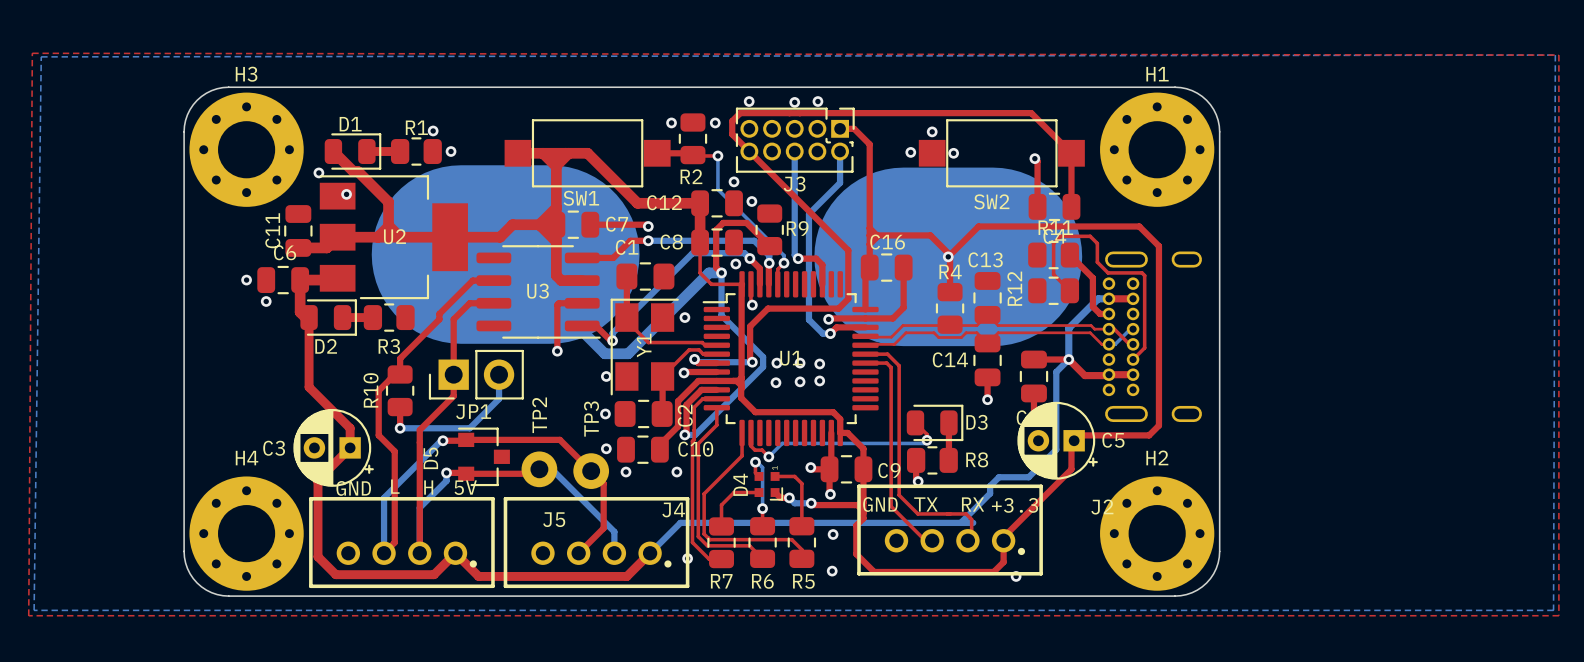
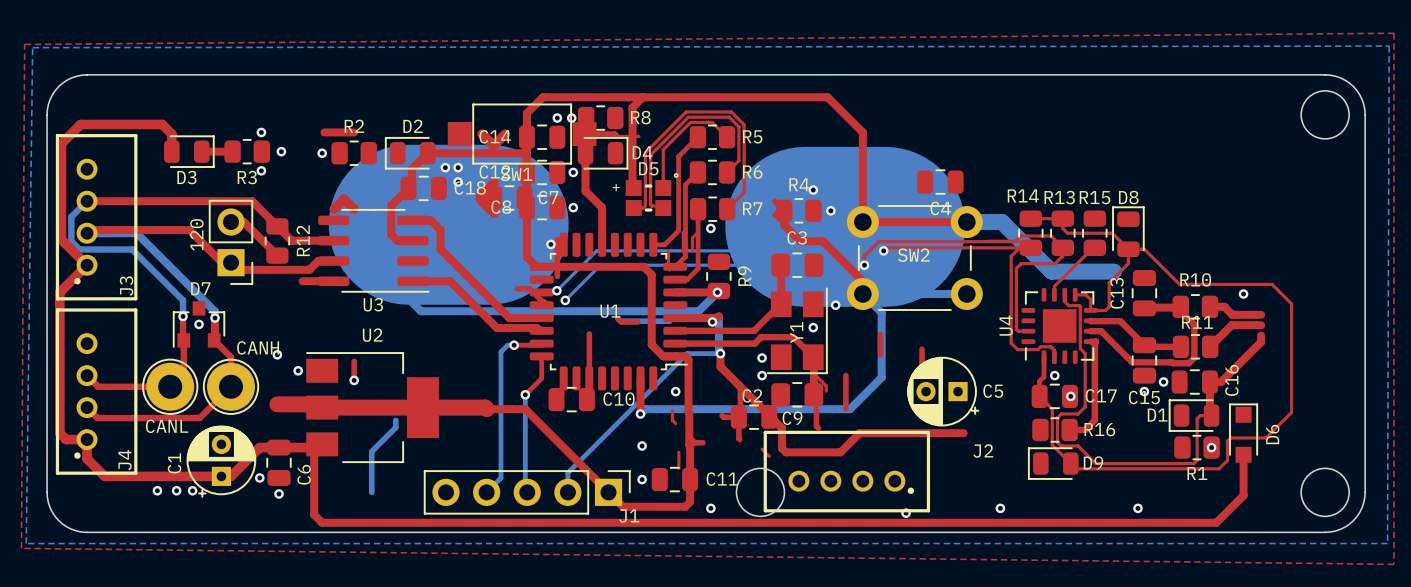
top zone outline: (32, 53) (1558, 55) (1558, 615) (28, 615) -> (24, 44) (1393, 33) (1393, 564) (21, 548)
board edge: (228, 87) (211, 90) (197, 100) (187, 114) (184, 131) (184, 557) (190, 573) (201, 586) (217, 594) (228, 596) (1175, 596) (1186, 594) (1197, 590) (1206, 583) (1213, 573) (1218, 563) (1219, 551) (1219, 131) (1216, 114) (1206, 100) (1192, 90) (1175, 87) -> (200, 74) (81, 75) (62, 83) (55, 90) (48, 104) (47, 492) (48, 502) (55, 516) (71, 529) (87, 532) (1325, 532) (1345, 527) (1359, 512) (1365, 492) (1365, 114) (1359, 94) (1345, 80) (1325, 74) (1048, 74)
via: (749, 101) -> none
via: (817, 101) -> none
via: (794, 102) -> none
round board edge: none -> [1300, 90, 1350, 140]
J3 footprint: [735, 107, 855, 173] -> [55, 134, 138, 301]
top track: none -> (642, 97) (632, 107) (633, 188)
SW2 footprint: [918, 119, 1085, 188] -> [846, 205, 983, 311]
via: (671, 122) -> none
via: (715, 122) -> none
D1 name position: D1 (350, 124) -> D1 (1157, 415)
R1 name position: R1 (416, 127) -> R1 (1197, 473)
top track: (840, 128) (854, 128) (869, 144) (869, 267) (865, 271) (865, 309) -> none
via: (433, 130) -> none
via: (932, 131) -> none
via: none -> (557, 118)
via: none -> (571, 118)
R2 rotation: 0° (692, 138) -> 90° clockwise (354, 153)
R2 position: (692, 138) -> (354, 153)
H3: (246, 149) -> none
H1: (1157, 149) -> none
via: none -> (261, 132)
top track: (333, 151) (353, 171) (358, 171) (388, 202) (388, 237) -> none
D1 rotation: 0° (352, 151) -> 180° (1194, 415)
D1 position: (352, 151) -> (1194, 415)
R1 position: (416, 151) -> (1196, 447)
via: (451, 151) -> none
bottom track: (794, 151) (794, 255) (798, 258) -> none
bottom track: (840, 151) (840, 182) (808, 214) (808, 319) (822, 333) (830, 333) -> none
via: (910, 152) -> none
top track: (517, 153) (587, 153) (637, 203) (700, 203) (700, 272) (711, 284) (742, 284) (741, 388) -> none
top track: (565, 153) (556, 162) (556, 275) (561, 280) (582, 280) -> none
via: (953, 153) -> none
bottom track: (717, 155) (717, 189) (784, 255) (784, 263) -> none
via: (717, 155) -> none
top track: none -> (697, 137) (678, 156) (678, 230) (664, 244) (653, 244)
top track: none -> (727, 137) (712, 122) (690, 122) (663, 149) (663, 188)
top track: (1034, 158) (1037, 161) (1037, 206) -> none
via: (1034, 158) -> none
top track: none -> (171, 151) (171, 134) (162, 124) (80, 124) (61, 143) (61, 239) (87, 265) (59, 292) (59, 433) (66, 439) (87, 439) (87, 458) (104, 476) (231, 476) (259, 447) (318, 447) (322, 444) (314, 452) (314, 514) (322, 522) (1216, 522) (1243, 495) (1243, 454)
top track: none -> (201, 151) (232, 151)
via: none -> (322, 153)
top track: none -> (526, 153) (427, 153) (411, 169) (411, 185) (391, 205) (391, 234) (397, 240) (412, 240)
top track: none -> (585, 153) (585, 191) (602, 207) (602, 244)
R2 name position: R2 (691, 176) -> R2 (354, 126)
via: (734, 181) -> none
J3 name position: J3 (794, 184) -> J3 (126, 286)
via: none -> (445, 167)
via: none -> (458, 167)
via: none -> (261, 170)
via: (346, 194) -> none
via: none -> (573, 172)
top track: none -> (697, 172) (685, 184) (685, 256) (675, 266)
top track: none -> (727, 172) (738, 160) (738, 126) (729, 117) (688, 117) (650, 154) (650, 204) (663, 208)
via: (751, 201) -> none
SW2 name position: SW2 (991, 201) -> SW2 (913, 255)
C12 position: (717, 203) -> (542, 172)
via: none -> (458, 182)
top track: (1071, 206) (1071, 153) (1031, 113) (740, 113) (732, 121) (732, 134) (848, 250) (848, 298) (838, 308) (767, 308) (750, 326) (750, 359) (752, 362) -> none
C18: none -> (423, 188)
via: none -> (813, 190)
top track: (556, 224) (512, 224) (500, 237) (337, 237) (326, 247) (298, 247) -> none
top track: (590, 224) (646, 224) (648, 226) -> none
via: (648, 226) -> none
top track: none -> (87, 201) (252, 201) (291, 240) (333, 240)
bottom track: none -> (87, 201) (71, 216) (71, 241) (79, 249) (132, 249) (183, 300) (183, 316)
R9 name rotation: 0° (797, 228) -> 90° counterclockwise (744, 276)
R9 position: (769, 229) -> (718, 276)
C11 name position: C11 (272, 230) -> C11 (722, 479)
C11 rotation: 0° (298, 230) -> 90° clockwise (674, 479)
C11 position: (298, 230) -> (674, 479)
via: none -> (573, 207)
top track: none -> (633, 208) (643, 208) (645, 206) (645, 152) (686, 111) (731, 111) (744, 124) (744, 192) (727, 209)
top track: (869, 235) (930, 235) (950, 255) (950, 285) -> none
U2 name position: U2 (394, 236) -> U2 (372, 335)
U2 position: (393, 237) -> (372, 407)
top track: none -> (698, 209) (698, 268) (687, 279) (675, 279)
top track: none -> (784, 210) (784, 225) (800, 241) (822, 241) (862, 281) (862, 294)
via: none -> (830, 210)
top track: (648, 240) (630, 240) (613, 257) (582, 257) -> none
bottom track: (648, 240) (754, 240) (769, 255) (769, 263) -> none
via: (648, 240) -> none
C8 position: (717, 242) -> (542, 207)
C16 name rotation: 0° (887, 242) -> 90° counterclockwise (1231, 380)
top track: (769, 246) (746, 222) (723, 222) (716, 230) (716, 267) (721, 272) -> none
C1 name position: C1 (627, 247) -> C1 (174, 463)
top track: none -> (1030, 218) (1062, 218) (1062, 228) (1067, 233) (1112, 233) (1128, 249)
top track: none -> (413, 220) (430, 220) (440, 230) (440, 249) (509, 318) (541, 318)
top track: none -> (231, 222) (243, 222) (277, 255)
top track: none -> (966, 222) (862, 222) (862, 132) (827, 97) (542, 97) (526, 113) (526, 257) (536, 266) (643, 266) (651, 274) (651, 344) (663, 356) (685, 356) (688, 359) (690, 501) (685, 506) (622, 506) (525, 409) (322, 407) (318, 404) (277, 404)
bottom track: none -> (966, 222) (1002, 222) (1051, 271) (1114, 271)
bottom track: (505, 254) (604, 353) (628, 353) (709, 272) (721, 272) (721, 315) (763, 357) (763, 366) (695, 434) (684, 434) -> none
R11 position: (1053, 255) -> (1195, 346)
top track: (1069, 255) (1092, 278) (1092, 306) (1100, 313) (1108, 313) -> none
via: (948, 256) -> none
top track: (749, 258) (759, 268) (759, 284) -> none
bottom track: (749, 258) (744, 253) (692, 253) (612, 333) (612, 340) -> none
via: (749, 258) -> none
top track: (798, 258) (816, 258) (822, 264) (822, 284) -> none
top track: (950, 258) (948, 256) (978, 226) (1139, 226) (1158, 246) (1158, 425) (1149, 435) (1073, 435) (1071, 437) (1071, 469) (1003, 537) (1003, 562) (993, 571) (874, 571) (856, 554) (856, 525) (863, 518) (863, 448) (847, 432) (840, 432) (840, 419) (833, 412) (755, 412) (741, 397) (741, 385) (736, 380) -> none
C13 name rotation: 0° (985, 259) -> 90° counterclockwise (1117, 293)
C1 footprint: [616, 262, 675, 291] -> [186, 425, 257, 498]
D8: none -> (1128, 231)
via: (769, 263) -> none
via: (784, 263) -> none
top track: none -> (87, 233) (90, 230) (189, 230) (222, 262) (231, 262) (238, 269) (309, 269) (318, 260) (333, 260)
bottom track: none -> (87, 233) (136, 233) (215, 311) (215, 318)
via: (735, 264) -> none
R14: none -> (1030, 233)
R13: none -> (1062, 233)
R15: none -> (1094, 233)
C16 position: (886, 267) -> (1194, 382)
top track: (903, 267) (903, 307) (892, 318) (828, 319) -> none
U1 footprint: [702, 271, 879, 447] -> [529, 232, 689, 391]
via: (721, 272) -> none
top track: (1108, 272) (1097, 262) (1097, 243) (1090, 236) (1060, 236) (1053, 243) (1053, 274) (1069, 290) -> none
top track: (1142, 272) (1144, 275) (1144, 347) (1133, 359) -> none
120: none -> (231, 242)
via: none -> (550, 244)
top track: (337, 278) (335, 280) (300, 280) (300, 312) (305, 317) (309, 317) (309, 387) (350, 428) (350, 447) (317, 480) (318, 556) (335, 574) (434, 574) (455, 553) (478, 576) (626, 576) (650, 553) -> none
via: (246, 280) -> none
C6 rotation: 0° (283, 280) -> 90° clockwise (278, 462)
C6 position: (283, 280) -> (278, 462)
top track: (493, 280) (472, 280) (439, 313) (439, 319) (400, 358) (400, 374) (394, 379) (389, 379) (378, 390) (378, 435) (394, 451) (394, 542) (384, 553) -> none
top track: none -> (1019, 247) (1011, 256) (1011, 343) (1017, 349) (1037, 349) (1040, 346) (1050, 346) (1054, 350) (1054, 357)
top track: none -> (1030, 247) (886, 247) (883, 250)
top track: none -> (1094, 247) (1054, 286) (1054, 294)
top track: none -> (1128, 249) (1128, 263) (1109, 282) (1109, 306) (1105, 310) (1090, 310) (1090, 299) (1086, 294) (1075, 294)
top track: none -> (1128, 249) (1144, 249) (1179, 284) (1272, 284) (1291, 303) (1291, 412) (1265, 437) (1230, 437) (1227, 441) (1227, 460) (1219, 468) (1076, 468) (1052, 445) (1052, 409) (1039, 396) (1039, 381) (1044, 376) (1044, 357)
bottom track: none -> (883, 250) (596, 250) (556, 290)
via: none -> (883, 250)
R12 name position: R12 (1014, 288) -> R12 (303, 240)
R12 rotation: 0° (1053, 290) -> 90° clockwise (277, 241)
R12 position: (1053, 290) -> (277, 241)
U3 position: (538, 291) -> (373, 250)
U3 name position: U3 (538, 291) -> U3 (373, 304)
C13 position: (987, 297) -> (1144, 293)
top track: (1108, 298) (1133, 298) -> none
bottom track: (1108, 298) (1098, 298) (1068, 328) (1068, 359) (1056, 372) (1056, 449) (1028, 477) (999, 477) (990, 486) (990, 493) (960, 522) -> none
top track: none -> (780, 265) (781, 304) (754, 330) (675, 330)
top track: none -> (864, 265) (864, 255) (878, 241) (1014, 241) (1020, 236) (1050, 236) (1062, 247) (1062, 256) (1055, 263) (1021, 263) (1016, 268) (1016, 329) (1018, 331) (1028, 331)
bottom track: none -> (864, 265) (600, 265) (565, 300)
via: none -> (864, 265)
via: (266, 301) -> none
top track: (493, 303) (469, 303) (453, 319) (453, 396) (419, 430) (419, 553) -> none
top track: (582, 303) (559, 303) (557, 304) (557, 351) -> none
via: (752, 305) -> none
bottom track: none -> (382, 273) (420, 311) (698, 311) (717, 292)
R4 rotation: 0° (950, 308) -> 90° clockwise (798, 210)
R4 position: (950, 308) -> (798, 210)
D2 rotation: 0° (328, 317) -> 180° (410, 153)
D2 position: (328, 317) -> (410, 153)
R3 position: (389, 317) -> (247, 151)
top track: none -> (412, 281) (450, 281) (496, 328) (536, 328) (541, 330)
via: (684, 317) -> none
via: (828, 319) -> none
top track: (626, 321) (648, 342) (702, 342) (704, 345) (716, 345) -> none
top track: (865, 327) (836, 327) (830, 333) -> none
via: none -> (556, 290)
top track: none -> (718, 291) (675, 292)
bottom track: (1133, 329) (1130, 329) (1115, 344) (1108, 344) -> none
via: none -> (717, 292)
bottom track: none -> (966, 294) (862, 294) (881, 312) (881, 377) (850, 409) (645, 409) (640, 413)
via: none -> (1243, 294)
top track: none -> (1064, 294) (1064, 301) (1068, 305) (1080, 306) (1080, 348) (1085, 353) (1085, 406) (1078, 413) (1061, 413) (1057, 417) (1057, 442) (1061, 445) (1078, 445) (1095, 463) (1193, 463) (1197, 460) (1197, 418) (1200, 415) (1211, 415) (1209, 413) (1209, 382) (1221, 382) (1261, 342) (1261, 335)
via: (830, 333) -> none
top track: (865, 336) (891, 337) (903, 325) (976, 325) (987, 314) (998, 325) (1091, 325) (1094, 329) (1114, 329) (1129, 344) (1133, 344) -> none
part: (1152, 336) -> none
via: none -> (565, 300)
via: (612, 340) -> none
via: none -> (835, 305)
top track: (1108, 344) (1101, 344) (1090, 332) (998, 332) (987, 343) (976, 332) (966, 332) (961, 337) (938, 337) (933, 332) (906, 332) (894, 344) (865, 345) -> none
top track: none -> (1180, 306) (1145, 306) (1144, 308) (1177, 308) (1194, 324) (1194, 357) (1189, 363) (1132, 362) (1101, 331) (1090, 331)
top track: none -> (1209, 306) (1224, 306) (1232, 314) (1261, 314)
Y1 rotation: 0° (644, 347) -> 180° (797, 330)
Y1 position: (644, 347) -> (797, 330)
via: (557, 351) -> none
top track: (716, 354) (703, 354) (699, 349) (689, 349) (662, 376) -> none
top track: (865, 354) (887, 354) (899, 365) (899, 495) (917, 513) (966, 513) (971, 519) (971, 541) -> none
top track: none -> (183, 316) (183, 373) (170, 386) (98, 386) (87, 375)
via: none -> (183, 316)
top track: none -> (718, 316) (717, 318) (675, 318)
bottom track: none -> (718, 316) (718, 352) (720, 353) (687, 353) (567, 472) (567, 492)
top track: none -> (215, 318) (214, 340) (231, 357) (231, 386) (199, 418) (97, 418) (87, 407)
via: none -> (215, 318)
via: (694, 359) -> none
top track: (1033, 359) (1068, 359) (1084, 375) (1133, 374) -> none
via: (1068, 359) -> none
C14 rotation: 0° (987, 360) -> 90° clockwise (542, 137)
C14 position: (987, 360) -> (542, 137)
top track: none -> (1090, 320) (1120, 321) (1145, 346) (1180, 346)
via: (752, 362) -> none
via: (776, 363) -> none
via: (819, 363) -> none
top track: (865, 363) (886, 363) (891, 367) (891, 506) (926, 541) -> none
D7: none -> (199, 324)
via: none -> (199, 324)
top track: none -> (1261, 325) (1231, 325) (1210, 346)
U4: none -> (1059, 326)
via: none -> (813, 327)
via: (684, 372) -> none
top track: (716, 372) (684, 372) -> none
JP1: (476, 374) -> none
bottom track: (499, 374) (499, 398) (469, 428) (400, 428) -> none
via: (606, 376) -> none
C15 position: (1033, 376) -> (1144, 360)
top track: (741, 377) (738, 380) (698, 380) (678, 401) (678, 426) (659, 444) (659, 449) -> none
via: (819, 380) -> none
via: (800, 381) -> none
via: (775, 382) -> none
top track: none -> (1090, 341) (1096, 341) (1094, 420) (1085, 429) (1069, 429)
top track: none -> (541, 343) (540, 345) (514, 345)
top track: none -> (675, 343) (754, 343) (761, 337) (793, 337) (813, 357) (813, 394)
bottom track: none -> (514, 345) (507, 345) (500, 351) (500, 478) (486, 492)
via: none -> (514, 345)
top track: (716, 389) (701, 389) (686, 404) (686, 433) (684, 434) -> none
R10 rotation: 0° (400, 390) -> 90° clockwise (1195, 306)
R10 position: (400, 390) -> (1195, 306)
top track: (716, 398) (702, 398) (694, 407) (692, 542) (709, 559) (721, 559) -> none
top track: none -> (720, 353) (720, 366) (782, 428) (782, 448) (786, 452) (840, 452) (859, 433) (963, 433)
via: none -> (720, 353)
via: none -> (277, 354)
via: (987, 399) -> none
top track: none -> (541, 356) (541, 378) (525, 394)
via: none -> (762, 358)
top track: (716, 407) (716, 425) (698, 443) (698, 536) (707, 545) (749, 545) (762, 558) -> none
C3 footprint: [293, 408, 374, 487] -> [771, 252, 824, 278]
via: (605, 413) -> none
C2 position: (643, 413) -> (797, 394)
C2 name rotation: 0° (685, 415) -> 90° clockwise (752, 395)
C2 name position: C2 (685, 415) -> C2 (752, 395)
via: none -> (298, 370)
via: none -> (762, 375)
D3 position: (935, 422) -> (189, 151)
D3 name position: D3 (976, 422) -> D3 (186, 177)
via: none -> (1054, 375)
top track: none -> (640, 378) (640, 413)
D5 footprint: [457, 427, 510, 487] -> [625, 173, 679, 217]
via: none -> (1163, 382)
top track: (742, 432) (742, 455) (704, 493) (704, 534) (708, 537) -> none
top track: (750, 432) (750, 446) (755, 450) (762, 450) (768, 456) -> none
via: (684, 434) -> none
CANL: none -> (170, 386)
CANH: none -> (231, 386)
top track: (442, 440) (559, 439) (603, 483) (603, 528) (578, 553) -> none
bottom track: (442, 440) (384, 497) (384, 553) -> none
via: (442, 440) -> none
via: none -> (675, 391)
bottom track: (927, 440) (923, 443) (782, 443) (768, 456) -> none
via: (927, 440) -> none
via: none -> (1144, 391)
bottom track: none -> (525, 394) (525, 490) (527, 492)
C17: none -> (1054, 396)
via: none -> (1070, 396)
C3 name position: C3 (274, 448) -> C3 (797, 237)
via position: (606, 448) -> (525, 394)
via: (768, 456) -> none
D5 name position: D5 (430, 458) -> D5 (648, 168)
R8 position: (932, 460) -> (600, 118)
bottom track: (755, 462) (762, 467) (762, 508) -> none
via: (755, 462) -> none
via: none -> (640, 413)
via: (810, 467) -> none
top track: (539, 469) (534, 473) (446, 472) -> none
TP2: (539, 469) -> none
bottom track: (551, 469) (614, 531) (614, 553) -> none
TP3: (591, 471) -> none
via: (446, 472) -> none
via: (625, 472) -> none
via: (676, 472) -> none
D4 footprint: [754, 472, 784, 501] -> [577, 136, 629, 170]
top track: (775, 476) (794, 476) (801, 483) (801, 526) -> none
via: (918, 481) -> none
R16: none -> (1055, 429)
D4 name position: D4 (740, 484) -> D4 (642, 152)
text: L (395, 486) -> none
text: H (428, 487) -> none
text: 5V (465, 487) -> none
D6: none -> (1243, 433)
text: GND (353, 488) -> none
top track: (759, 492) (734, 492) (721, 505) (721, 526) -> none
via: (830, 494) -> none
bottom track: (789, 497) (794, 503) (811, 503) -> none
via: (789, 497) -> none
via: none -> (642, 445)
top track: (863, 502) (860, 505) (813, 505) (811, 503) -> none
via: (811, 503) -> none
via: none -> (1211, 447)
text: GND (880, 504) -> none
text: TX (925, 504) -> none
text: RX (973, 504) -> none
text: +3.3 (1015, 505) -> none
via: (762, 508) -> none
D9: none -> (1053, 463)
bottom track: (973, 522) (680, 522) (650, 553) -> none
round board edge: none -> [736, 468, 785, 517]
round board edge: none -> [1300, 468, 1350, 517]
H4: (246, 533) -> none
H2: (1157, 533) -> none
via: (833, 534) -> none
via: none -> (259, 477)
top track: (708, 537) (709, 539) (791, 539) (801, 549) (801, 558) -> none
via: none -> (642, 479)
J5: (401, 542) -> none
J4 rotation: 0° (596, 542) -> 90° clockwise (96, 391)
J4 position: (596, 542) -> (96, 391)
R7 rotation: 0° (721, 542) -> 90° clockwise (712, 209)
R7 position: (721, 542) -> (712, 209)
R6 rotation: 0° (762, 542) -> 90° clockwise (712, 172)
R6 position: (762, 542) -> (712, 172)
R5 rotation: 0° (801, 542) -> 90° clockwise (712, 137)
R5 position: (801, 542) -> (712, 137)
via: none -> (157, 490)
via: none -> (176, 490)
via: none -> (192, 490)
J1: none -> (527, 492)
via: none -> (278, 493)
via: none -> (710, 508)
via: (832, 571) -> none
via: none -> (1000, 508)
via: none -> (1138, 508)
R7 name position: R7 (721, 581) -> R7 (752, 208)
R6 name position: R6 (762, 581) -> R6 (752, 172)
R5 name position: R5 (803, 581) -> R5 (752, 136)

